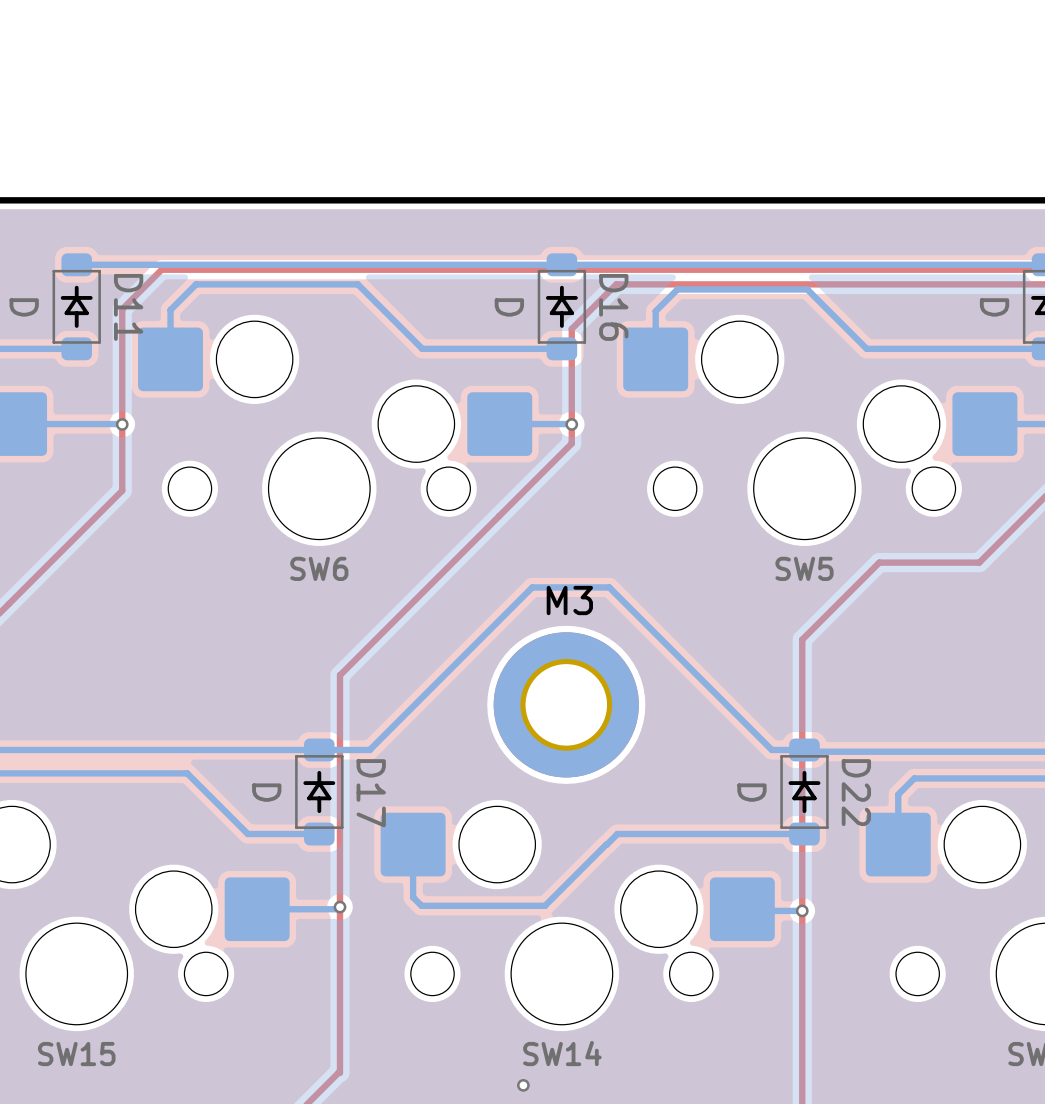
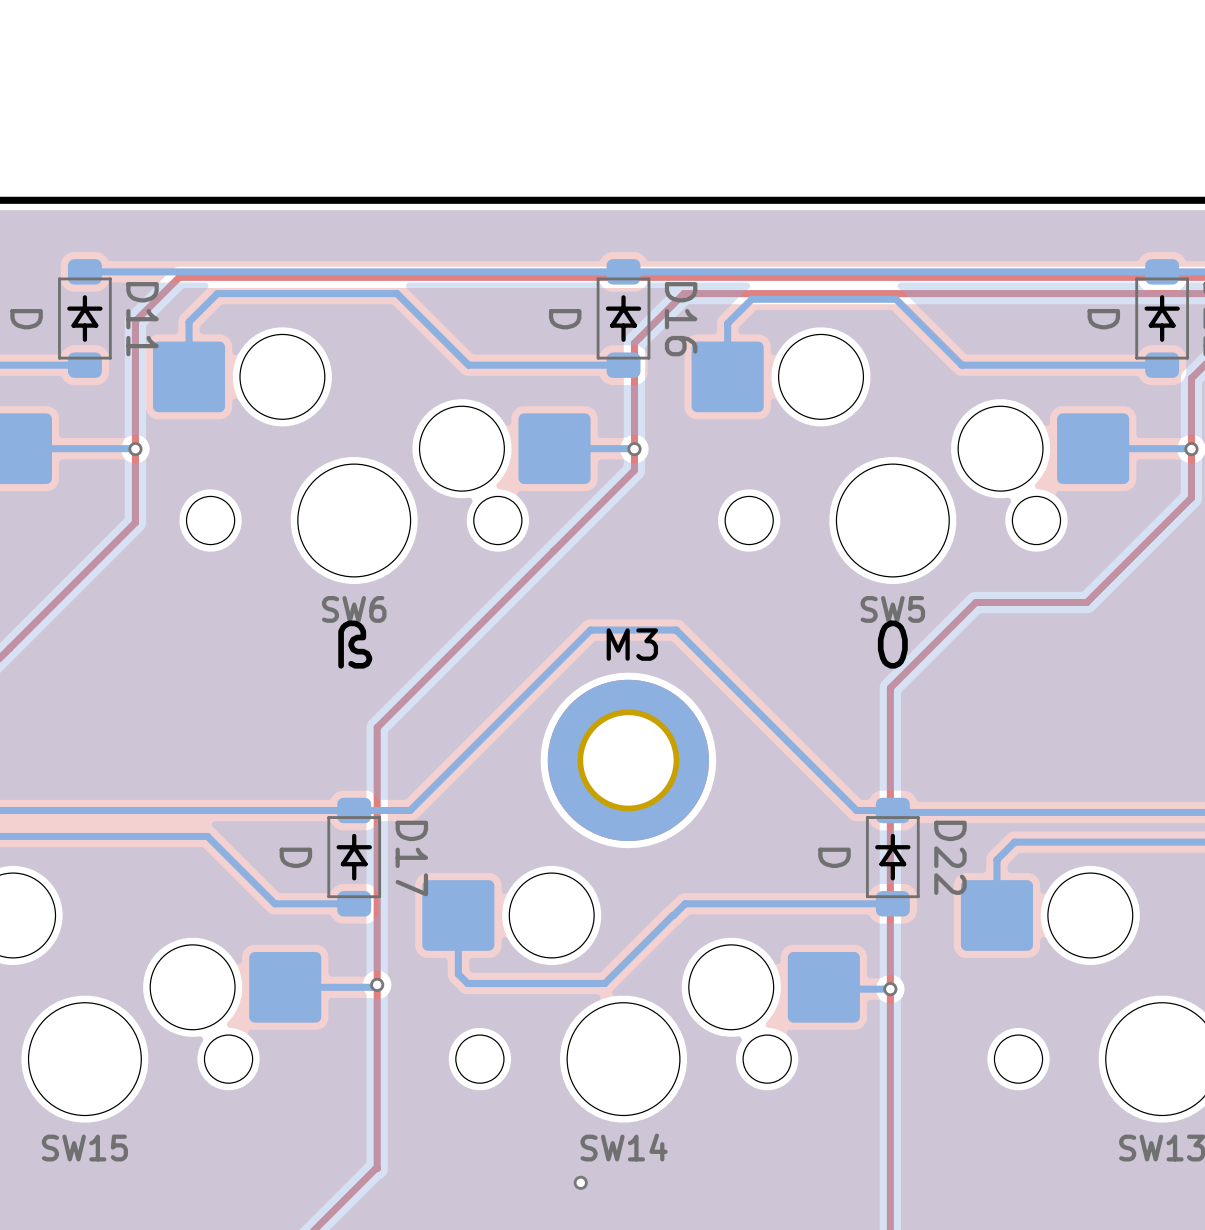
SW6 text: none -> ß (355, 644)
SW5 text: none -> 0 (892, 644)

